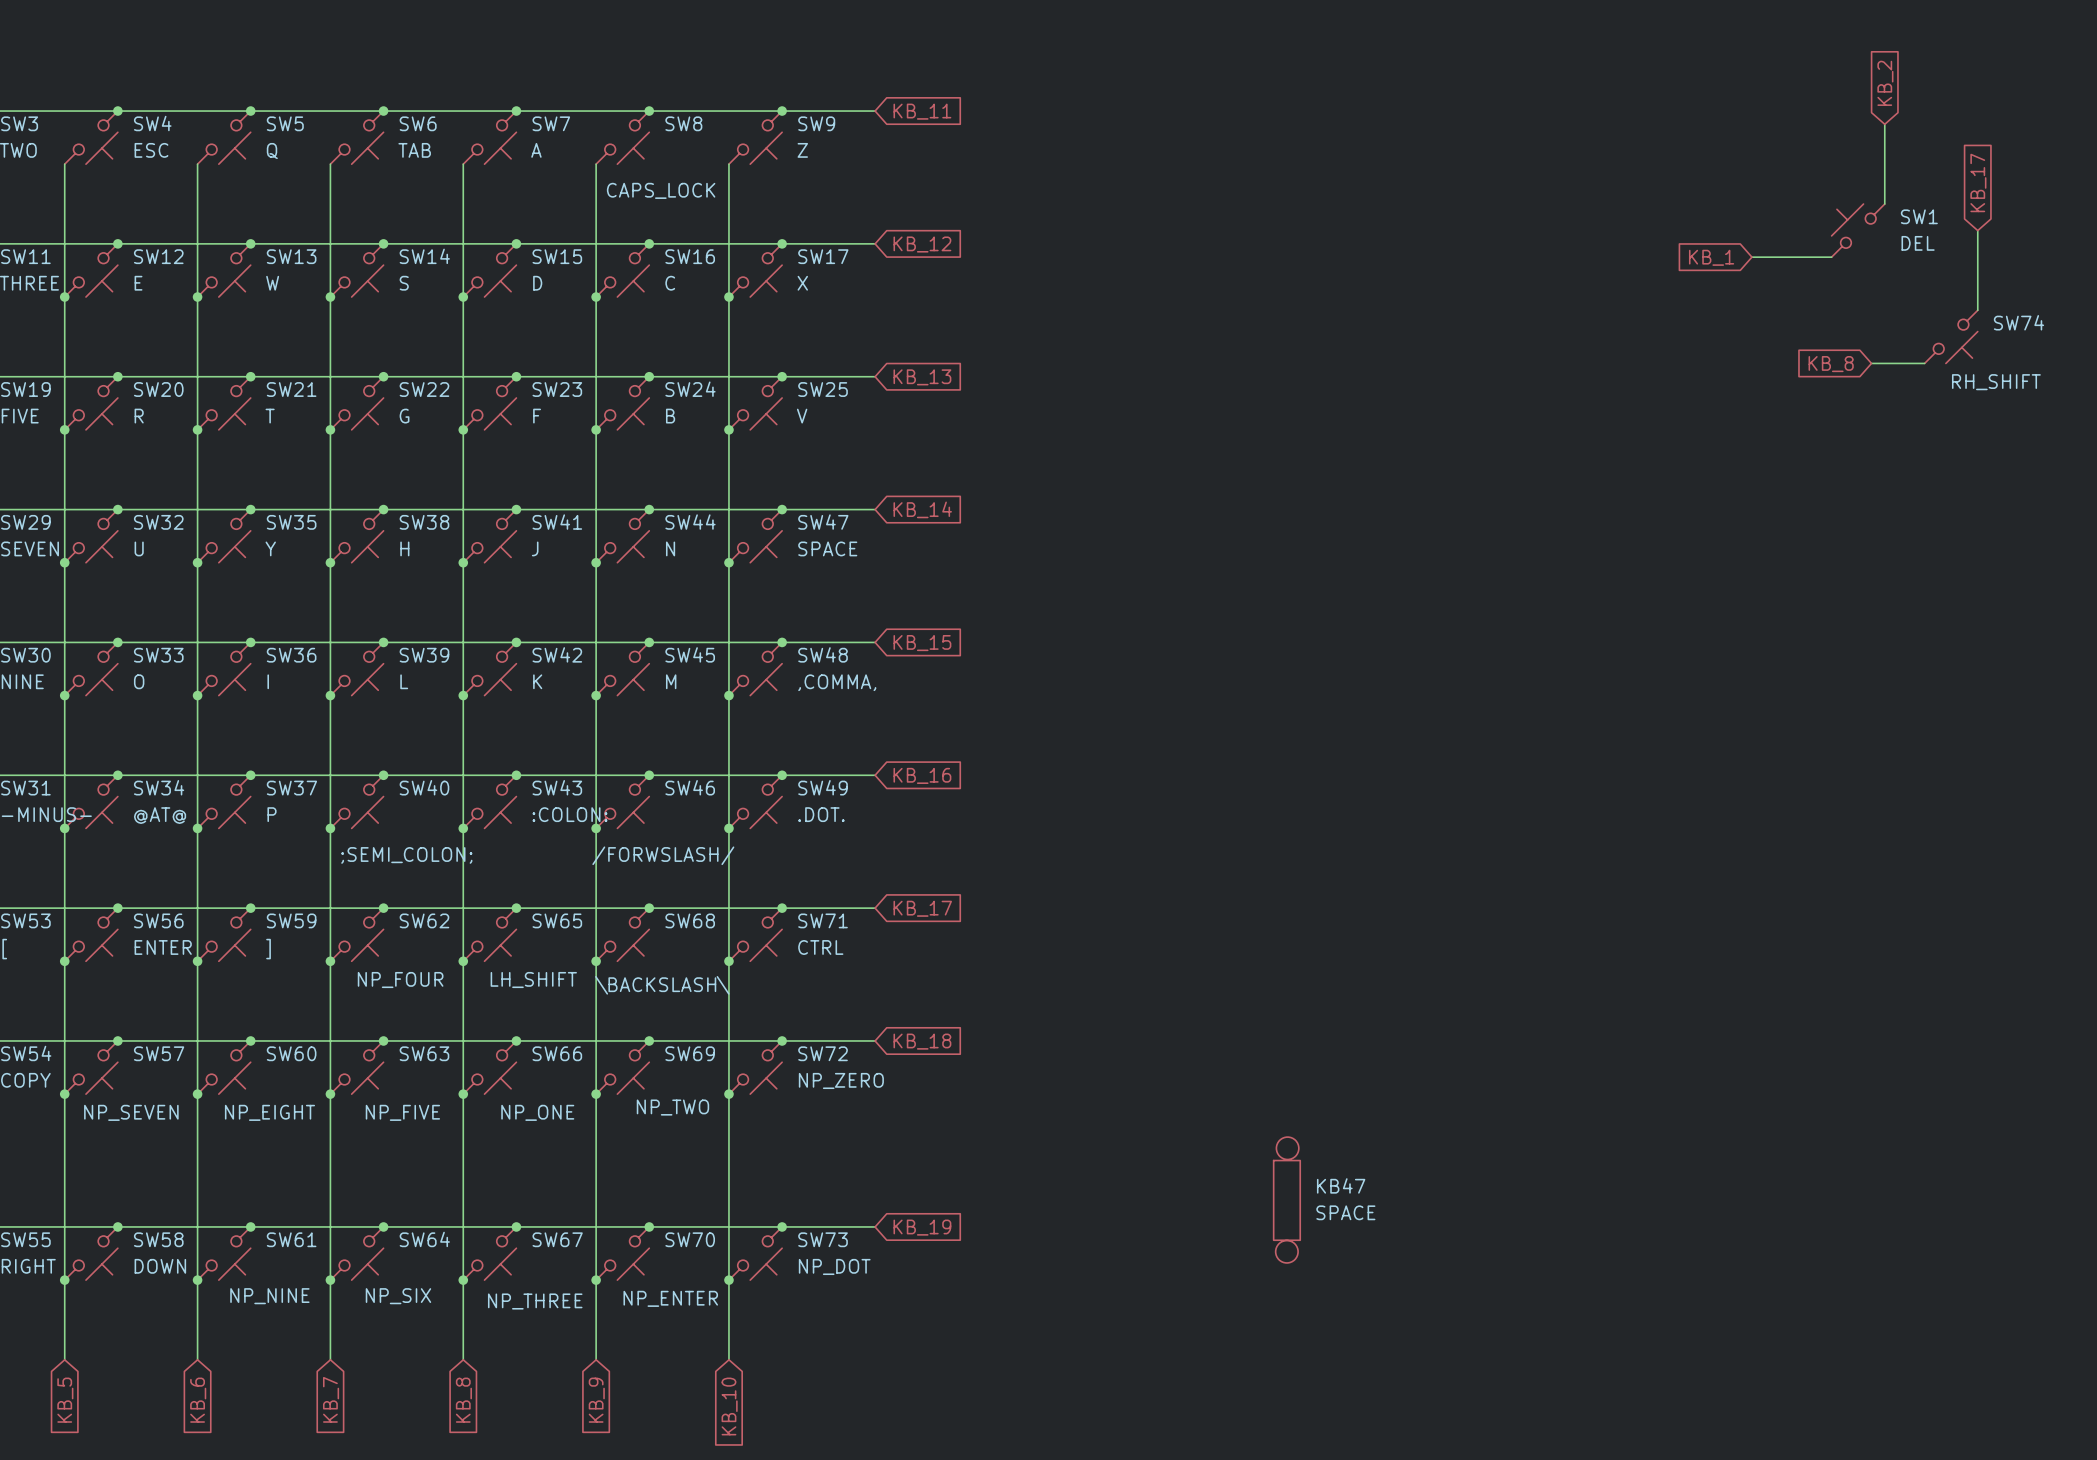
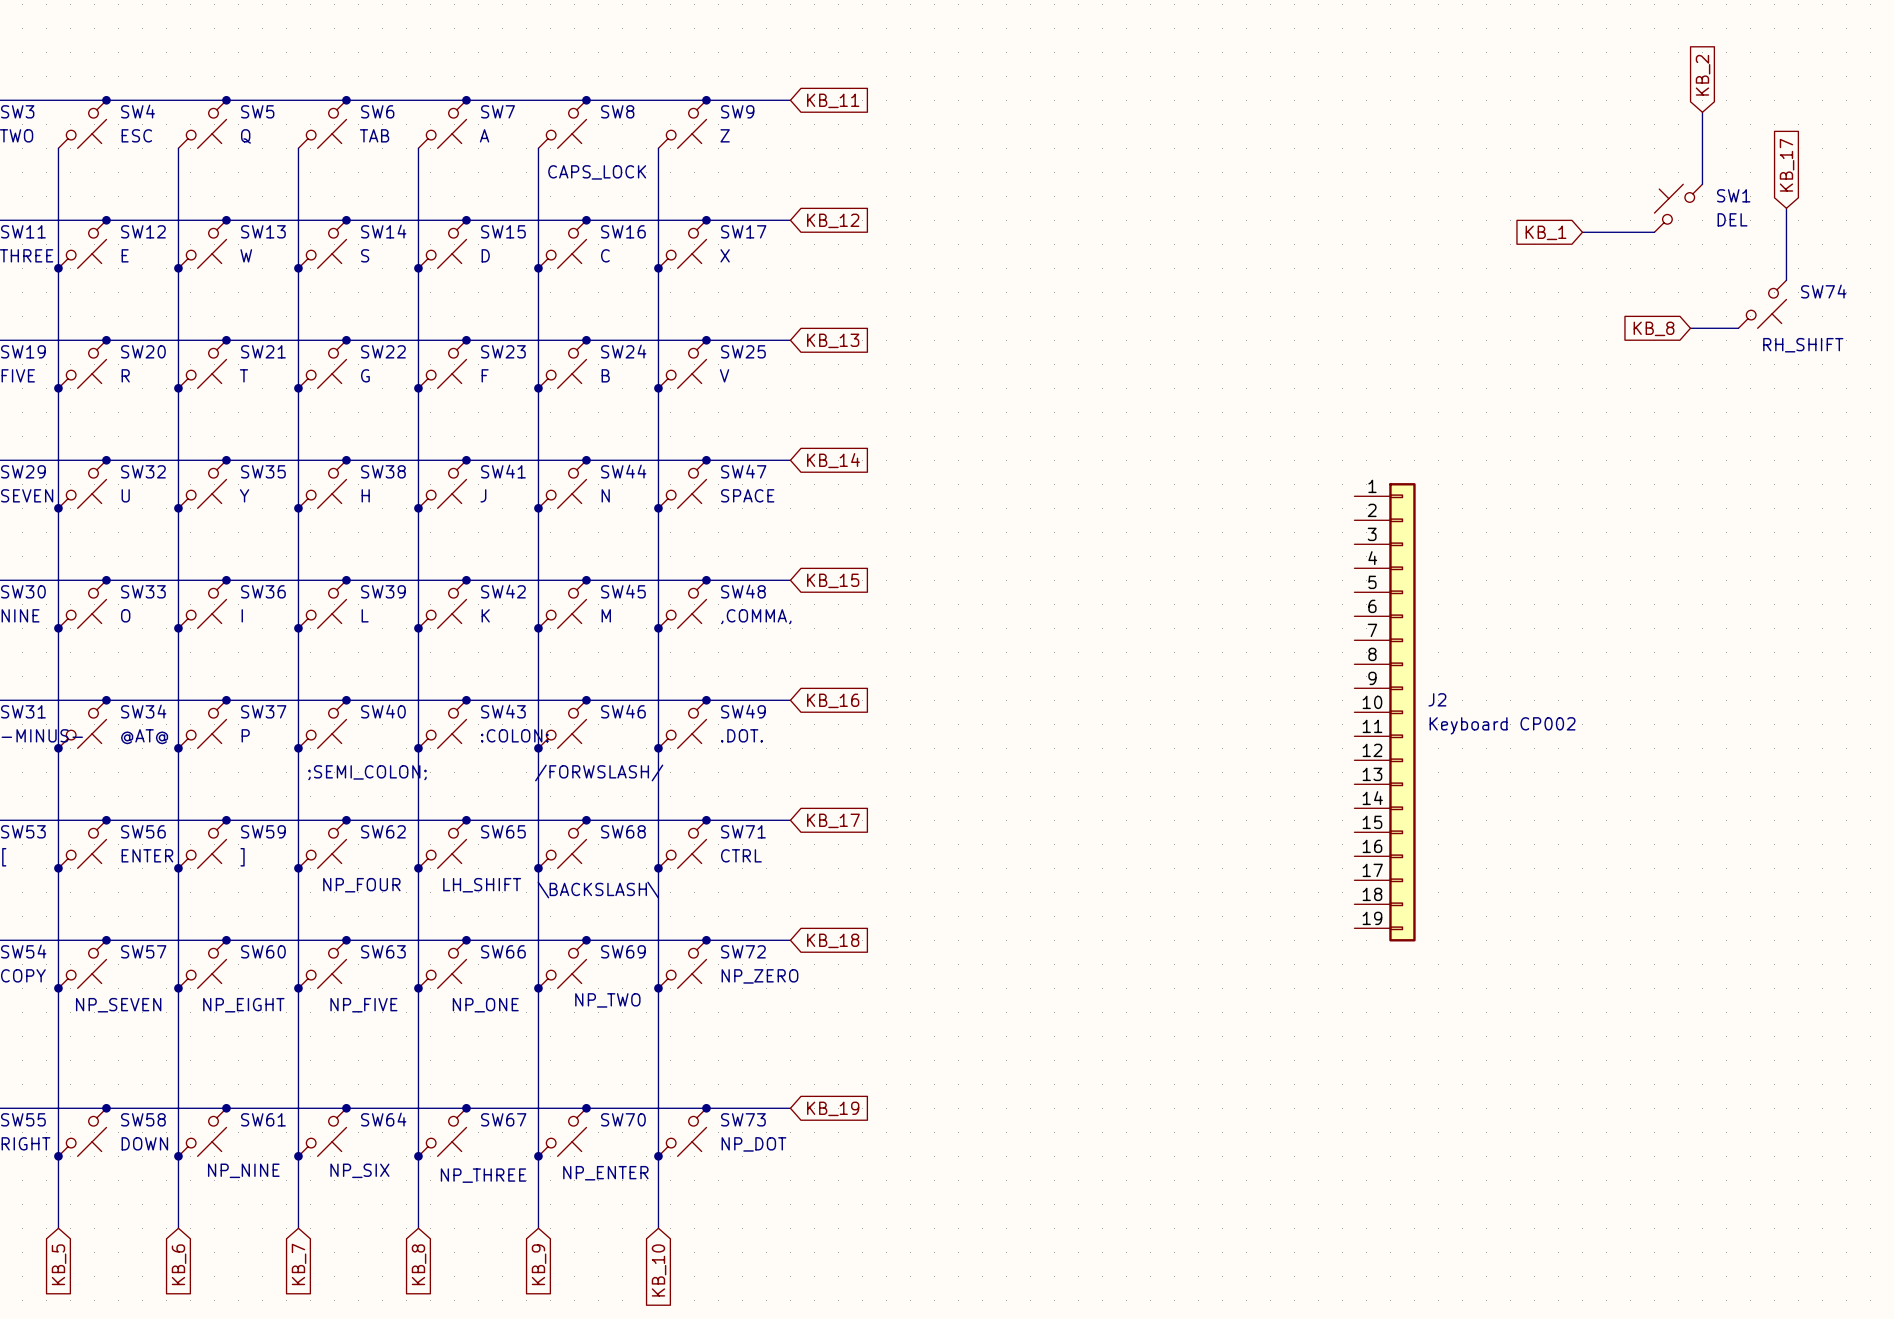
J2: none -> Keyboard CP002 (1385, 712)
KB47: SPACE (1286, 1200) -> none

